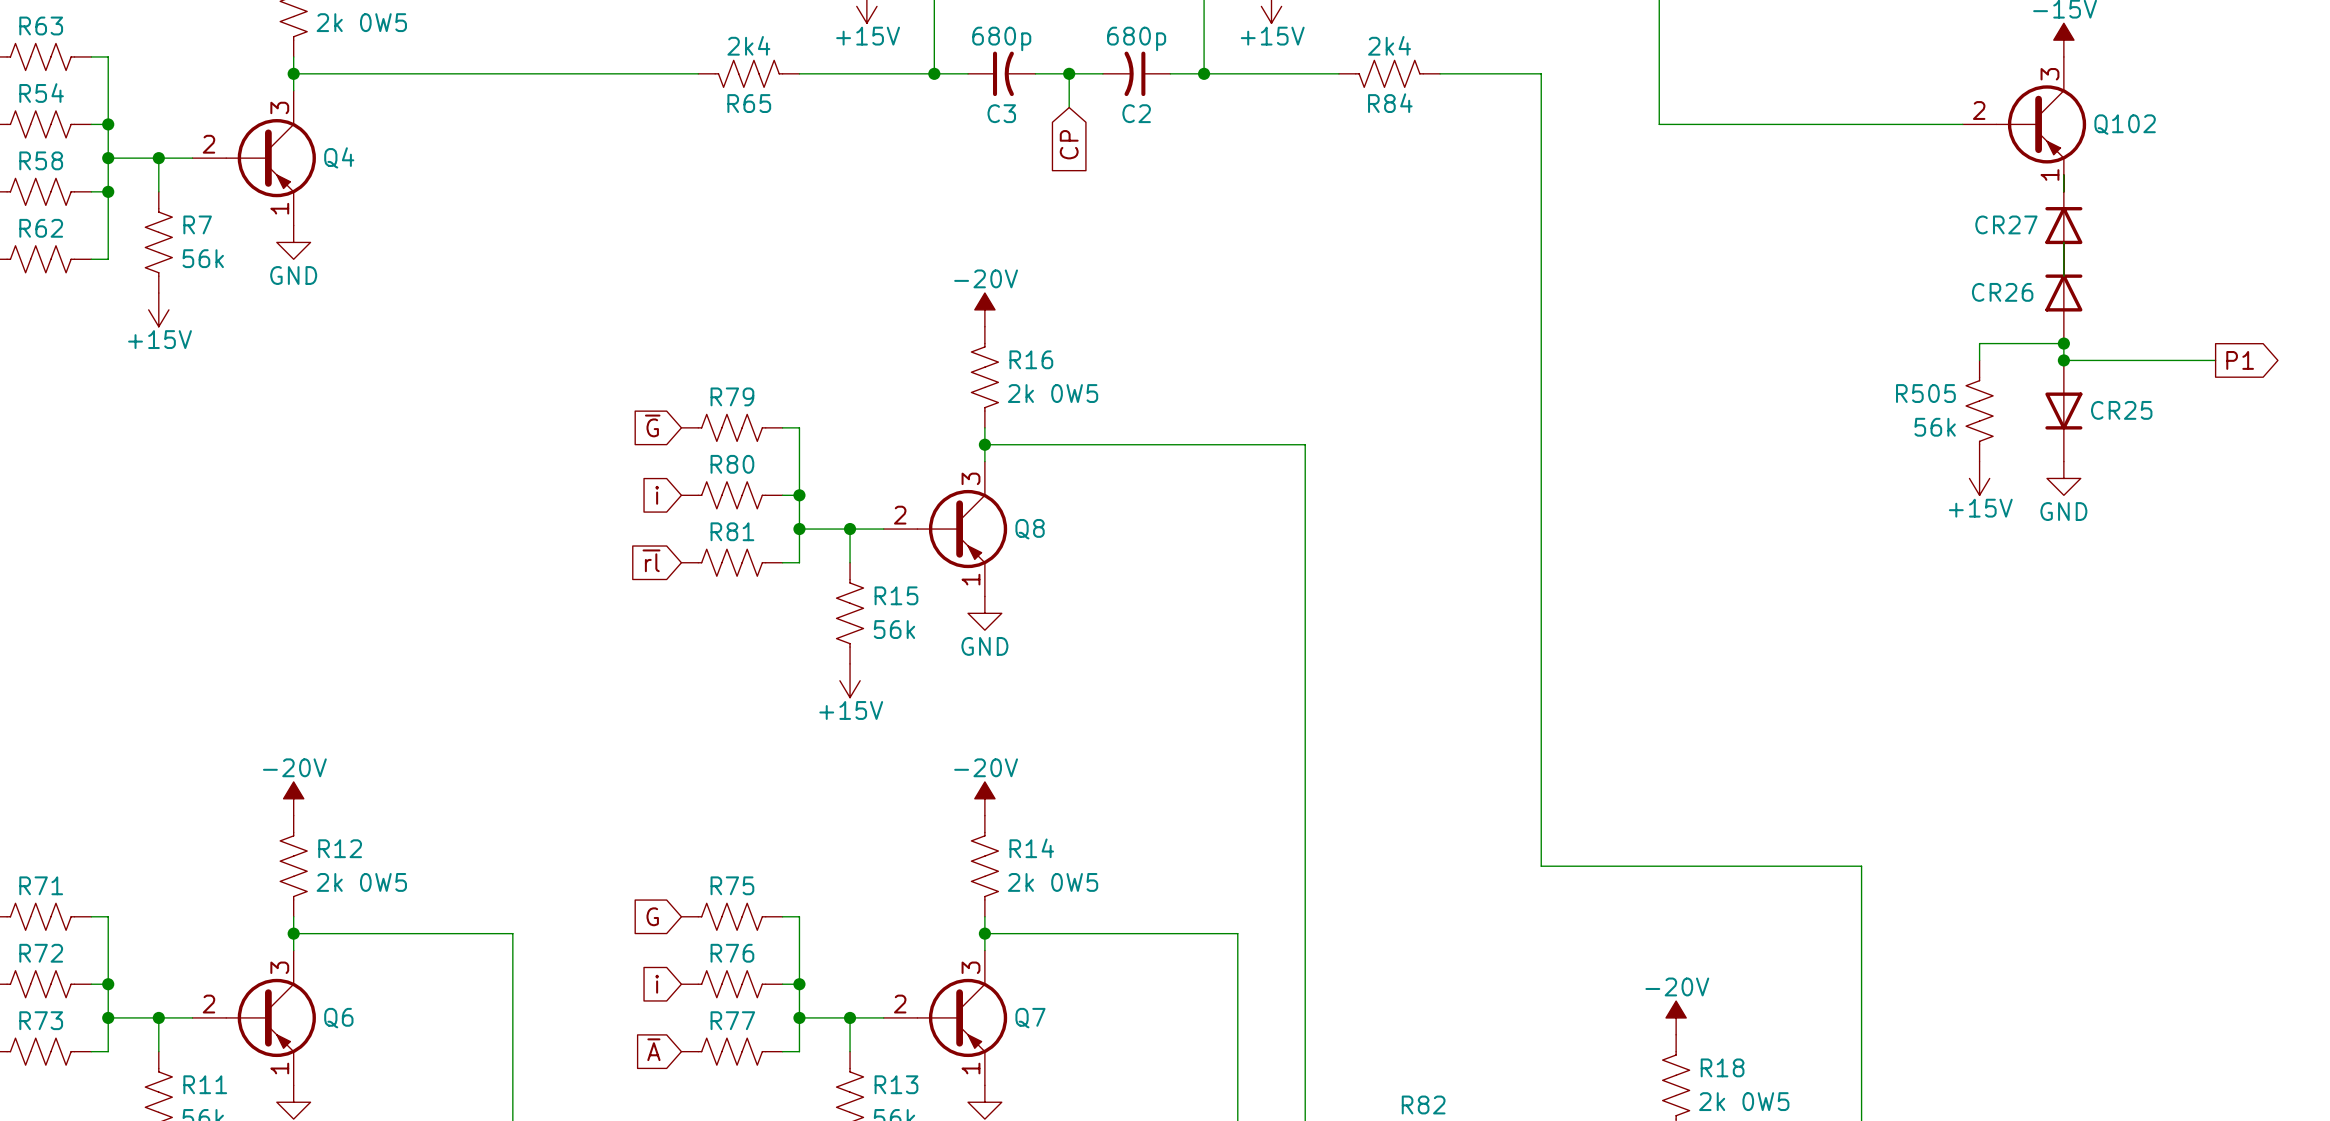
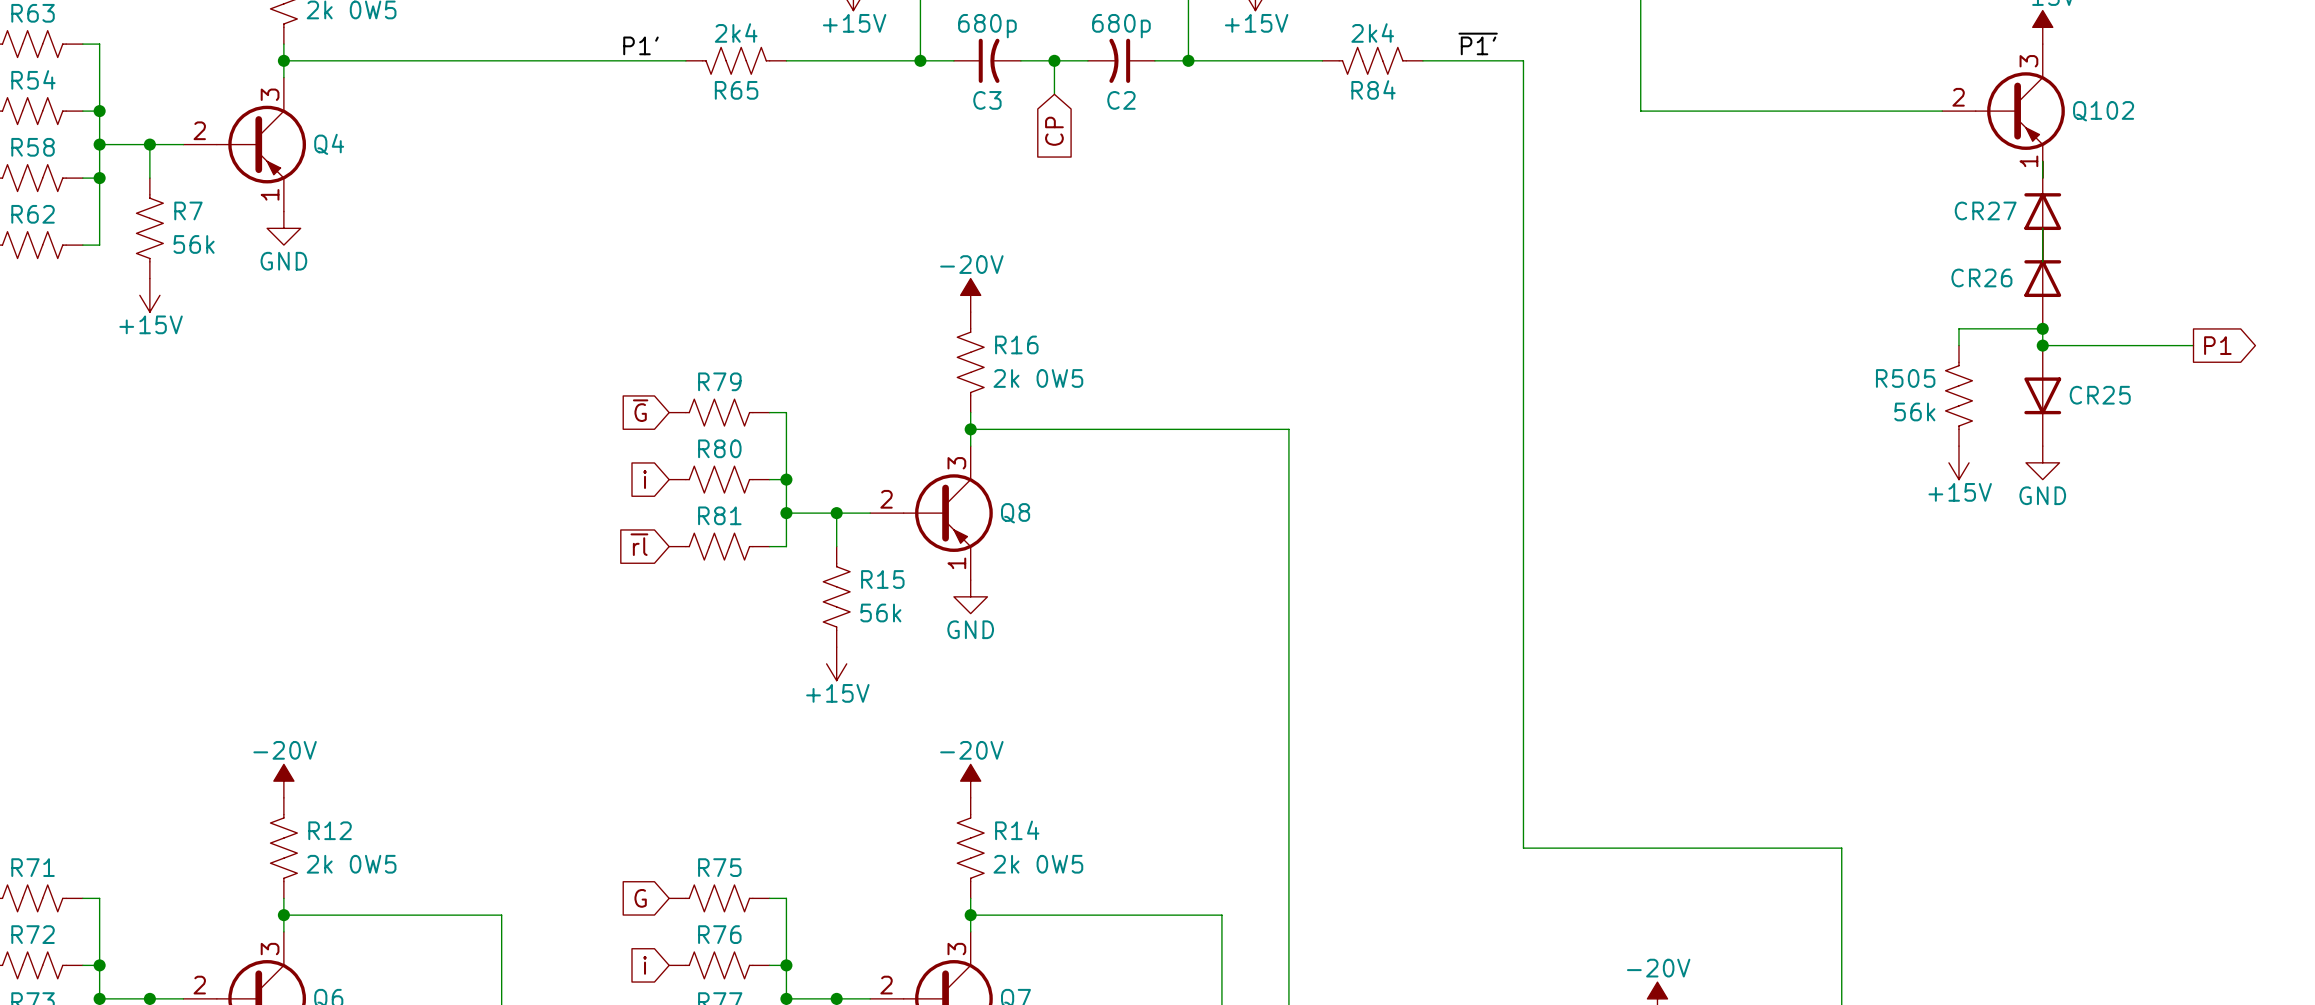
label: none -> ~{P1'} (1478, 43)
label: none -> P1' (640, 45)

